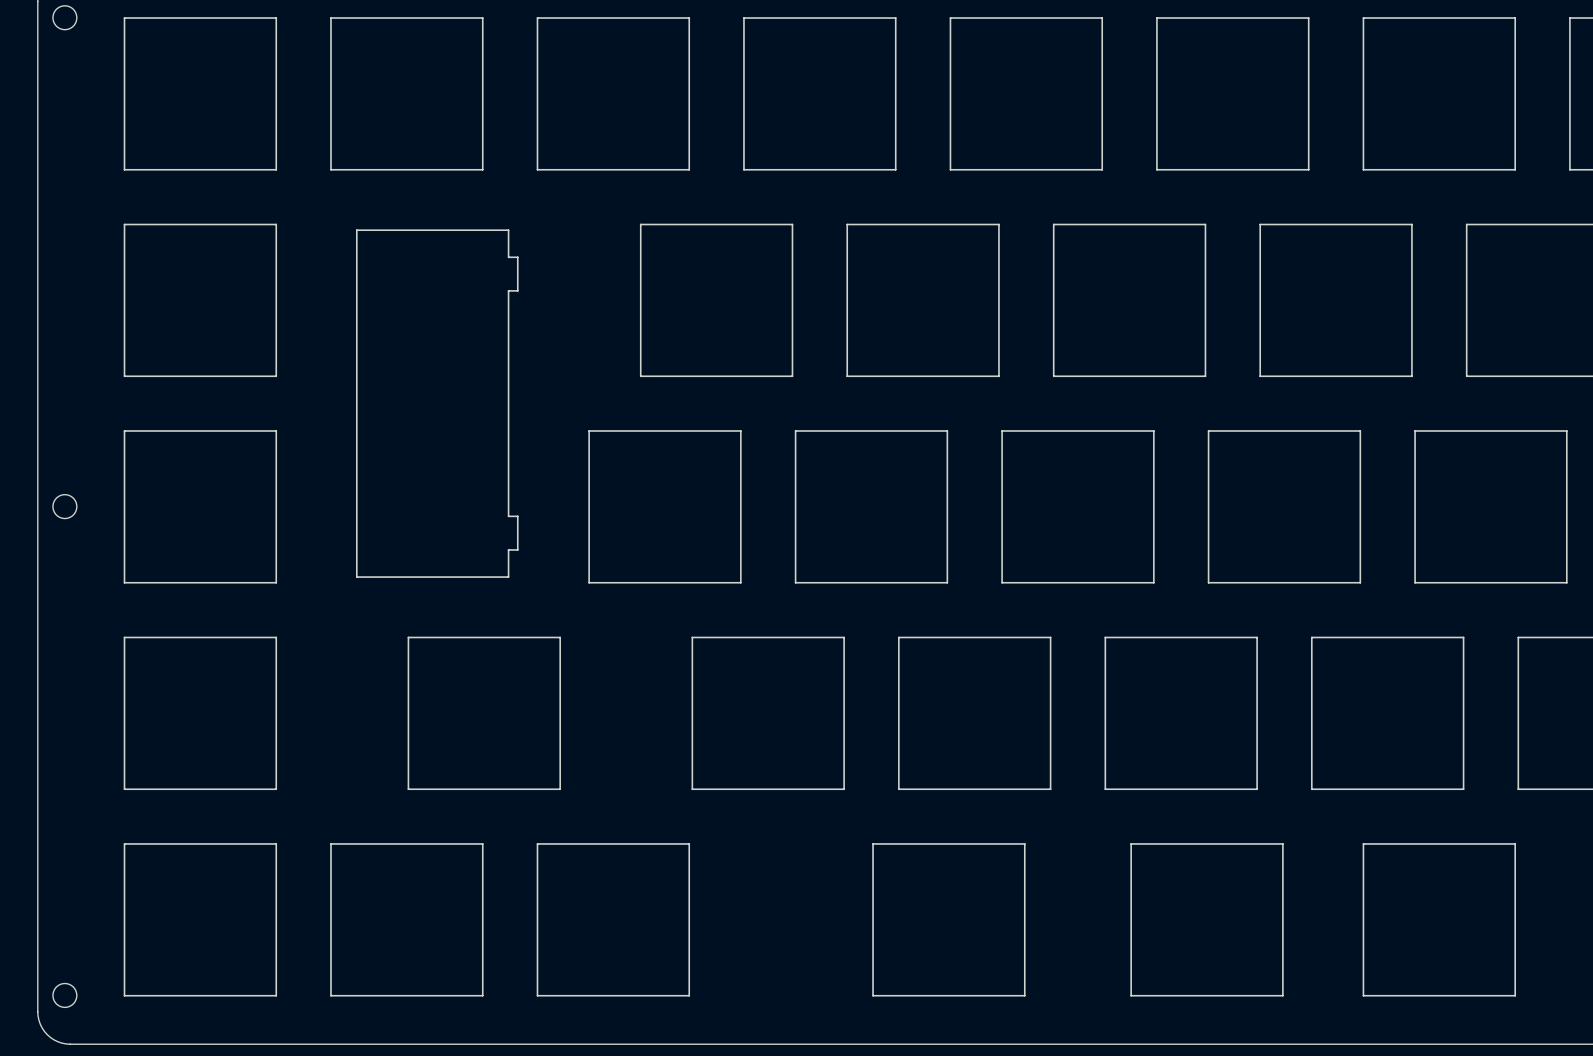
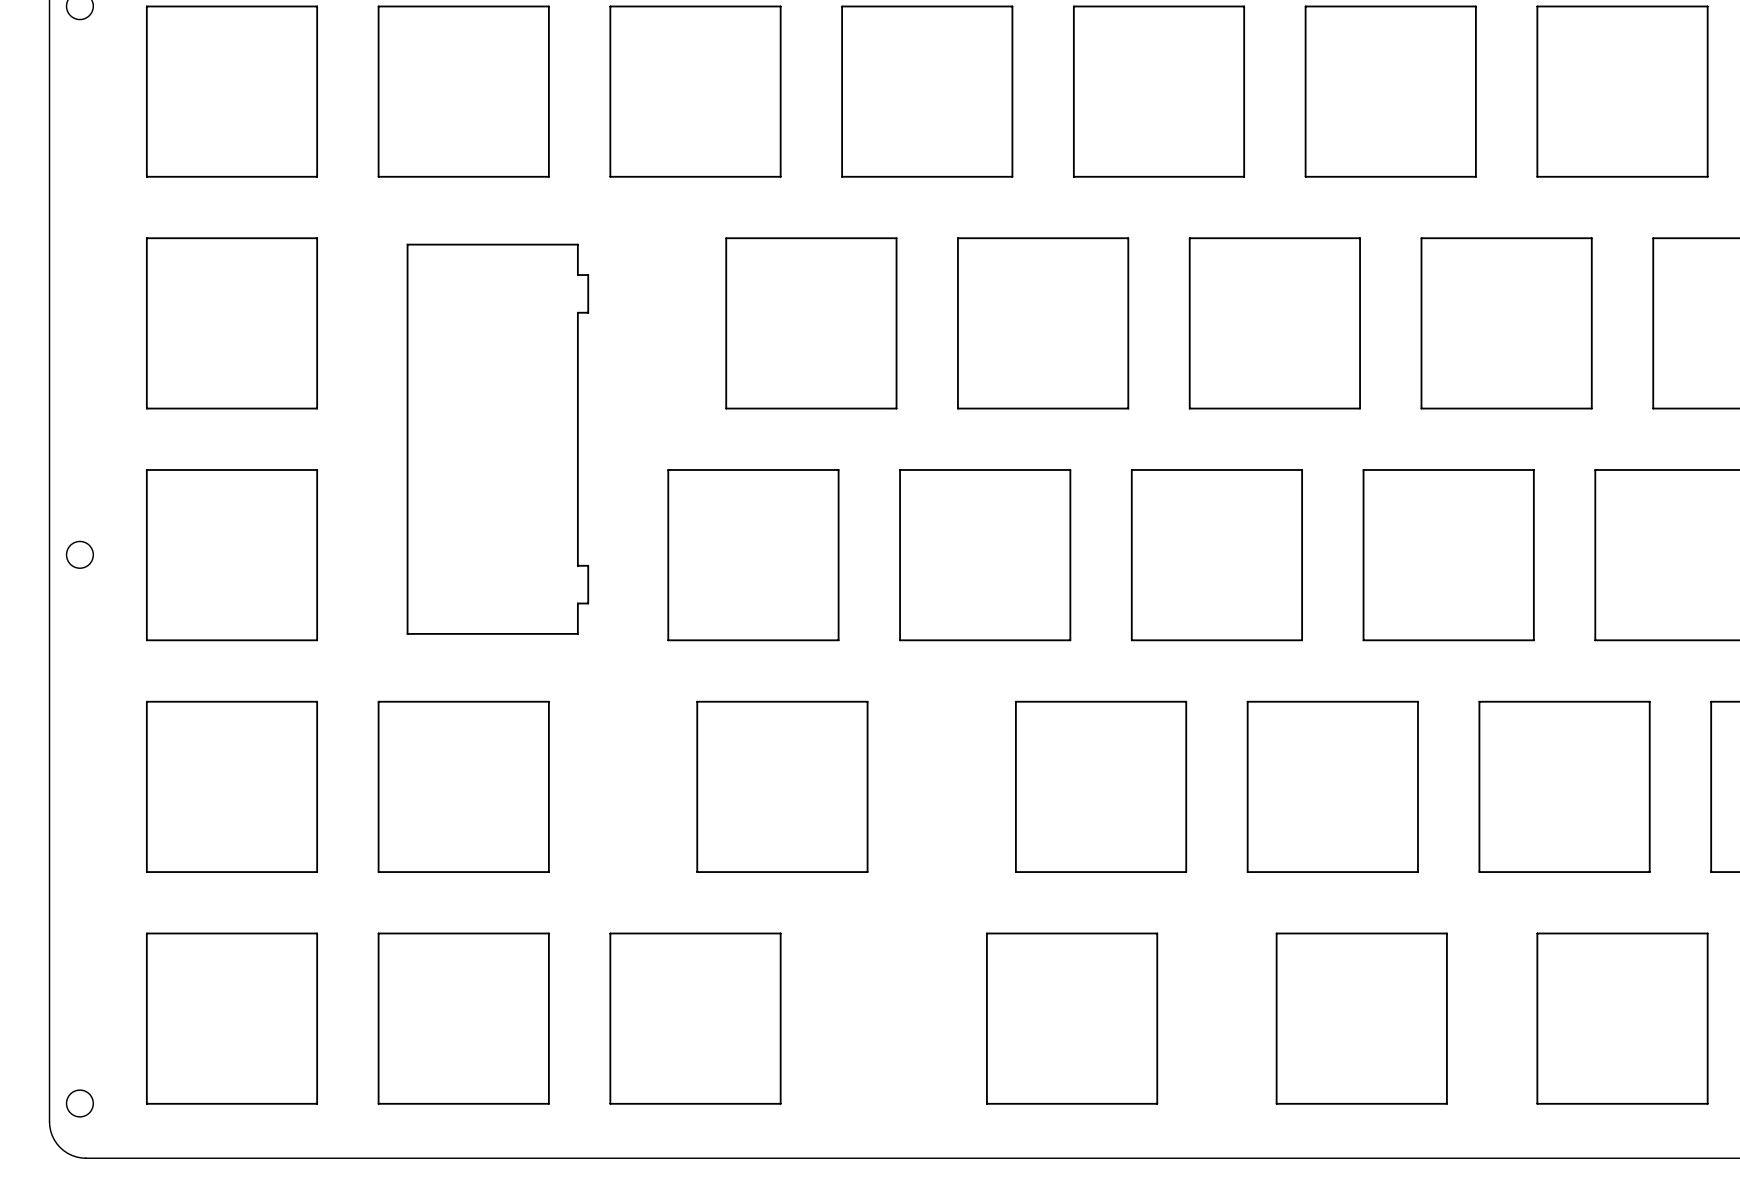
drawing position: (484, 713) -> (463, 786)
drawing position: (768, 713) -> (782, 786)

